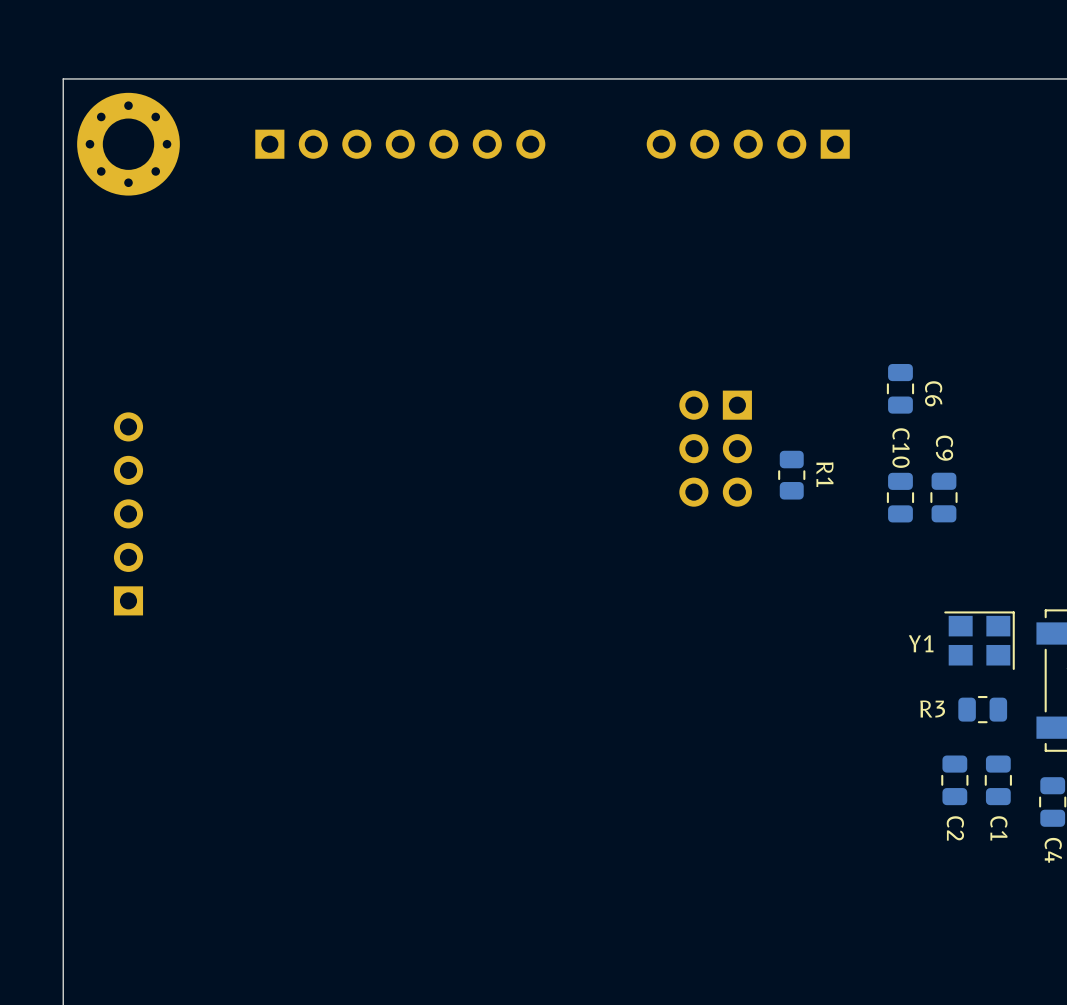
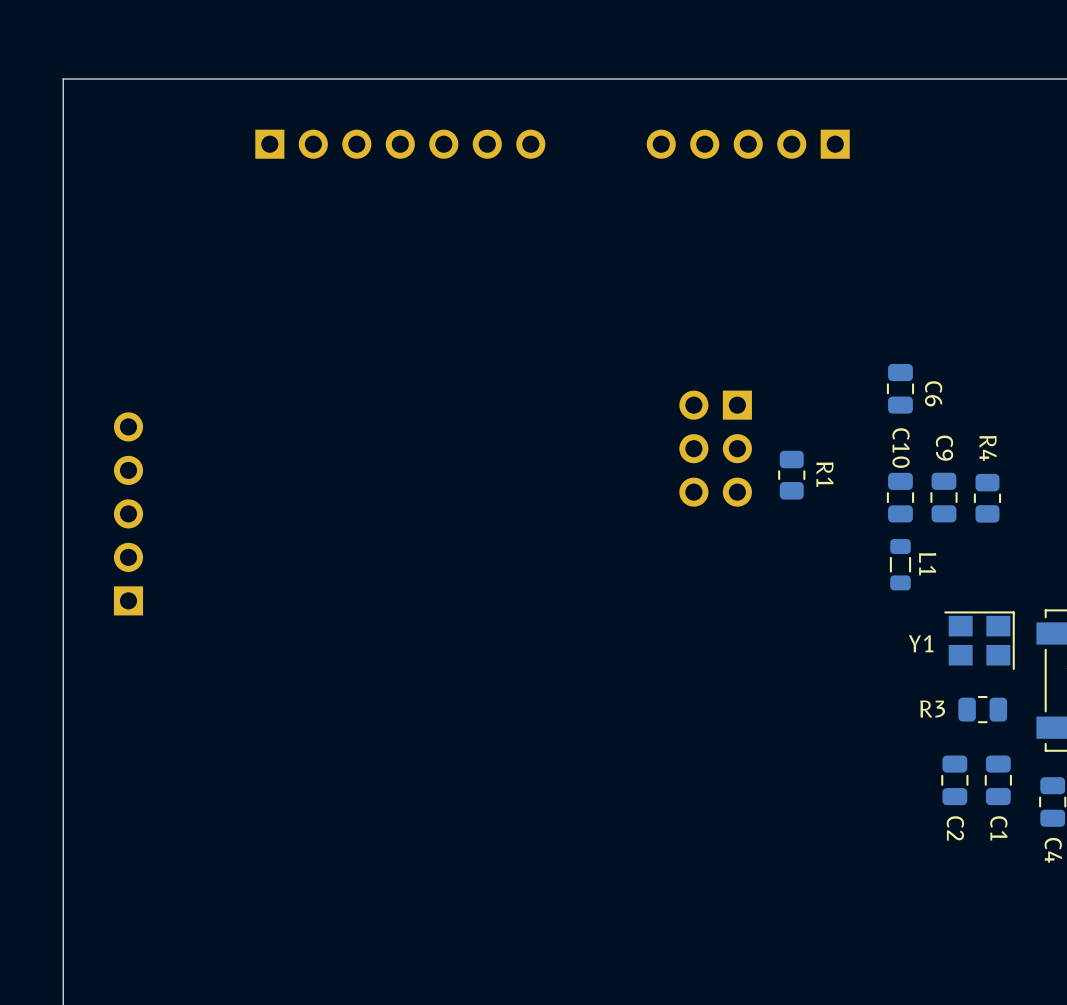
part: (128, 144) -> none
R4: none -> (987, 498)
L1: none -> (900, 564)

